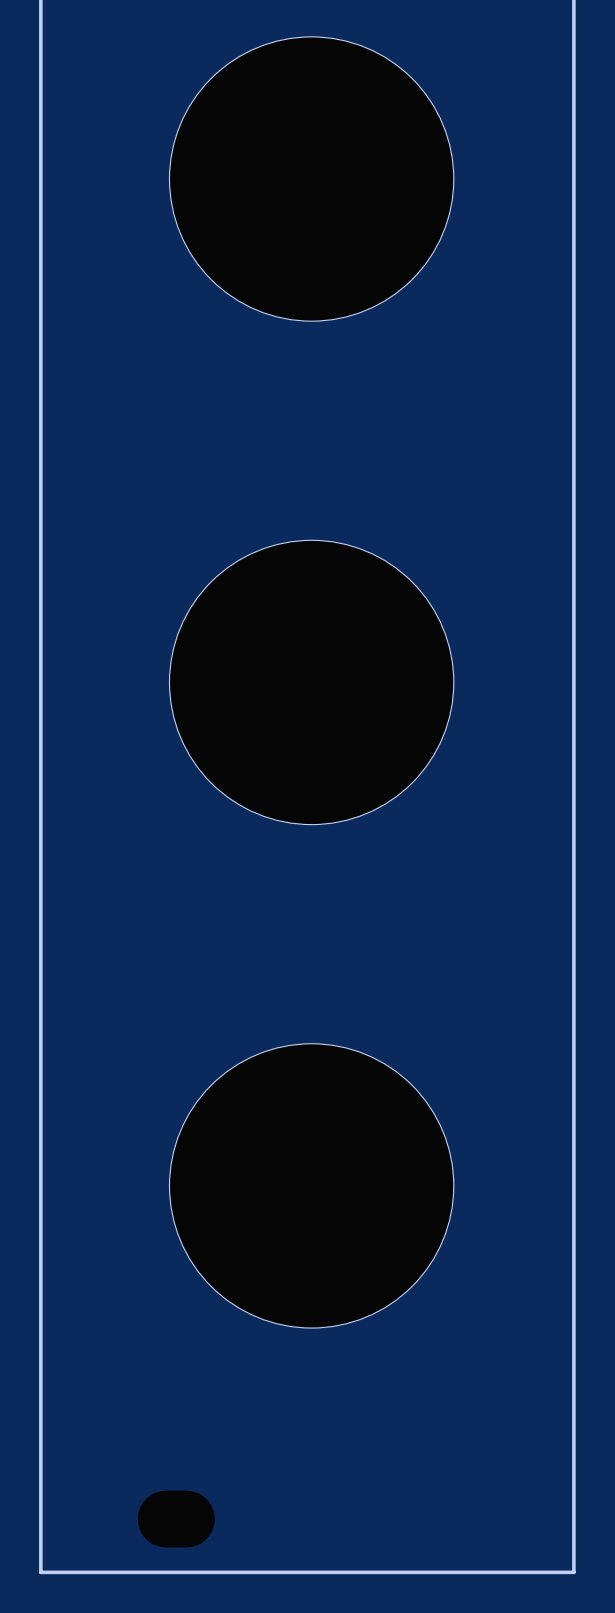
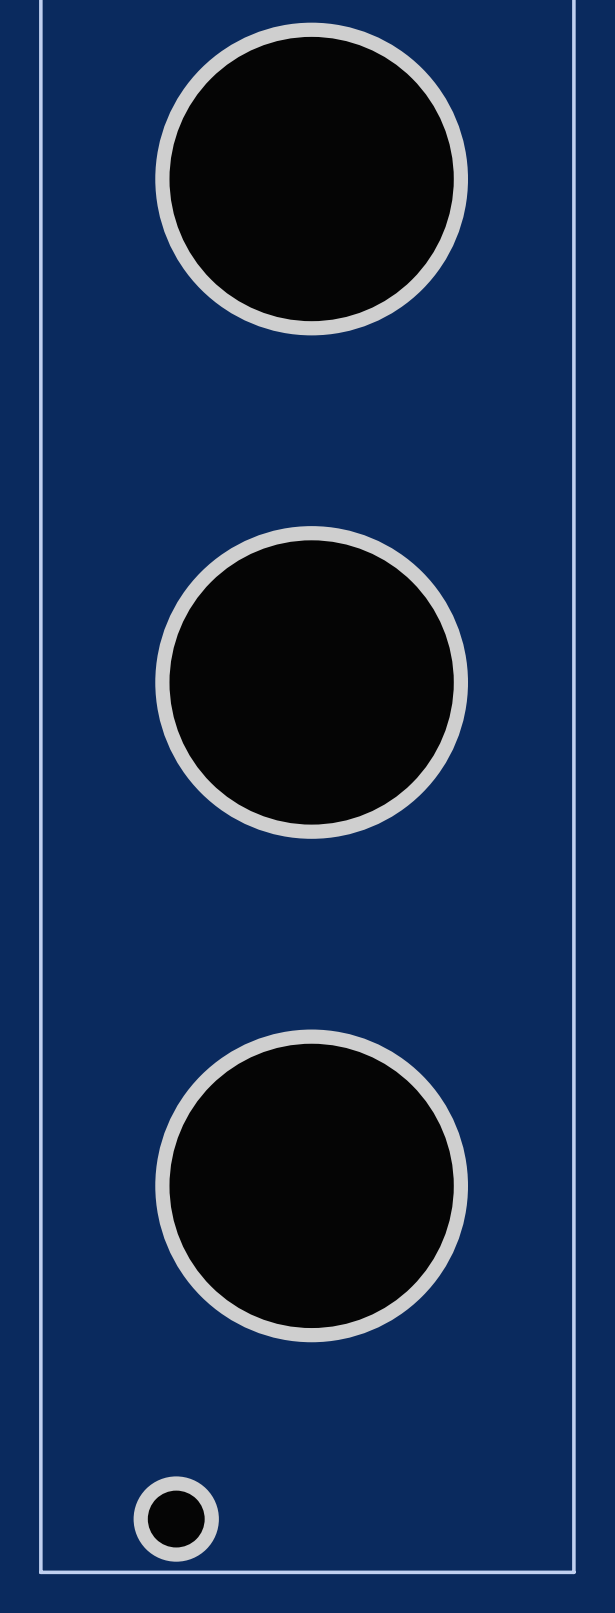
part footprint: [169, 36, 454, 322] -> [155, 22, 469, 336]
part footprint: [169, 540, 454, 825] -> [155, 526, 469, 839]
part footprint: [169, 1043, 454, 1329] -> [155, 1029, 469, 1343]
part footprint: [137, 1490, 215, 1548] -> [133, 1476, 219, 1562]

